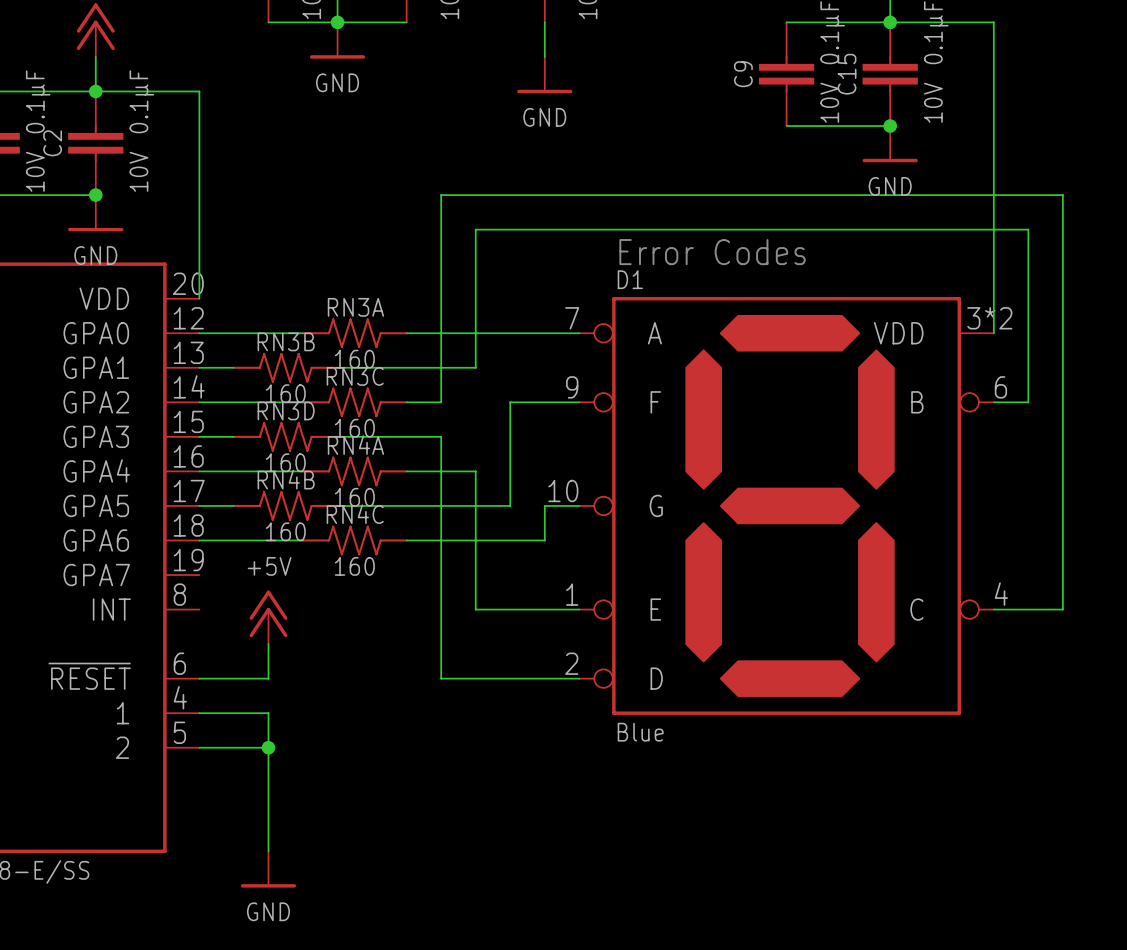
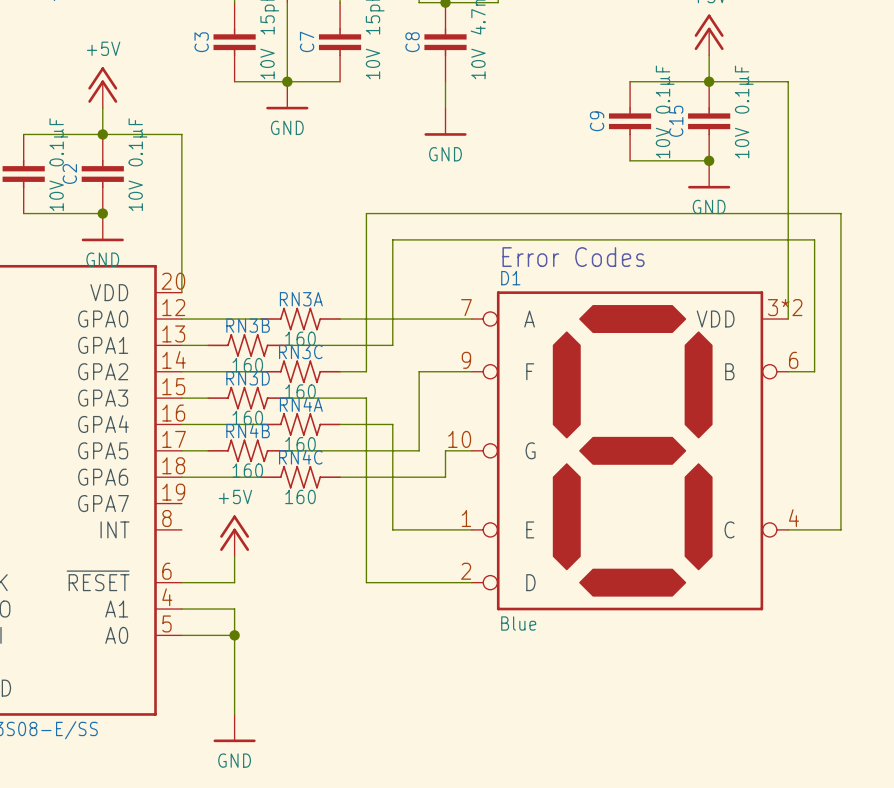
part pin name: 1 (122, 713) -> A1 (116, 609)
part pin name: 2 (122, 747) -> A0 (116, 635)

